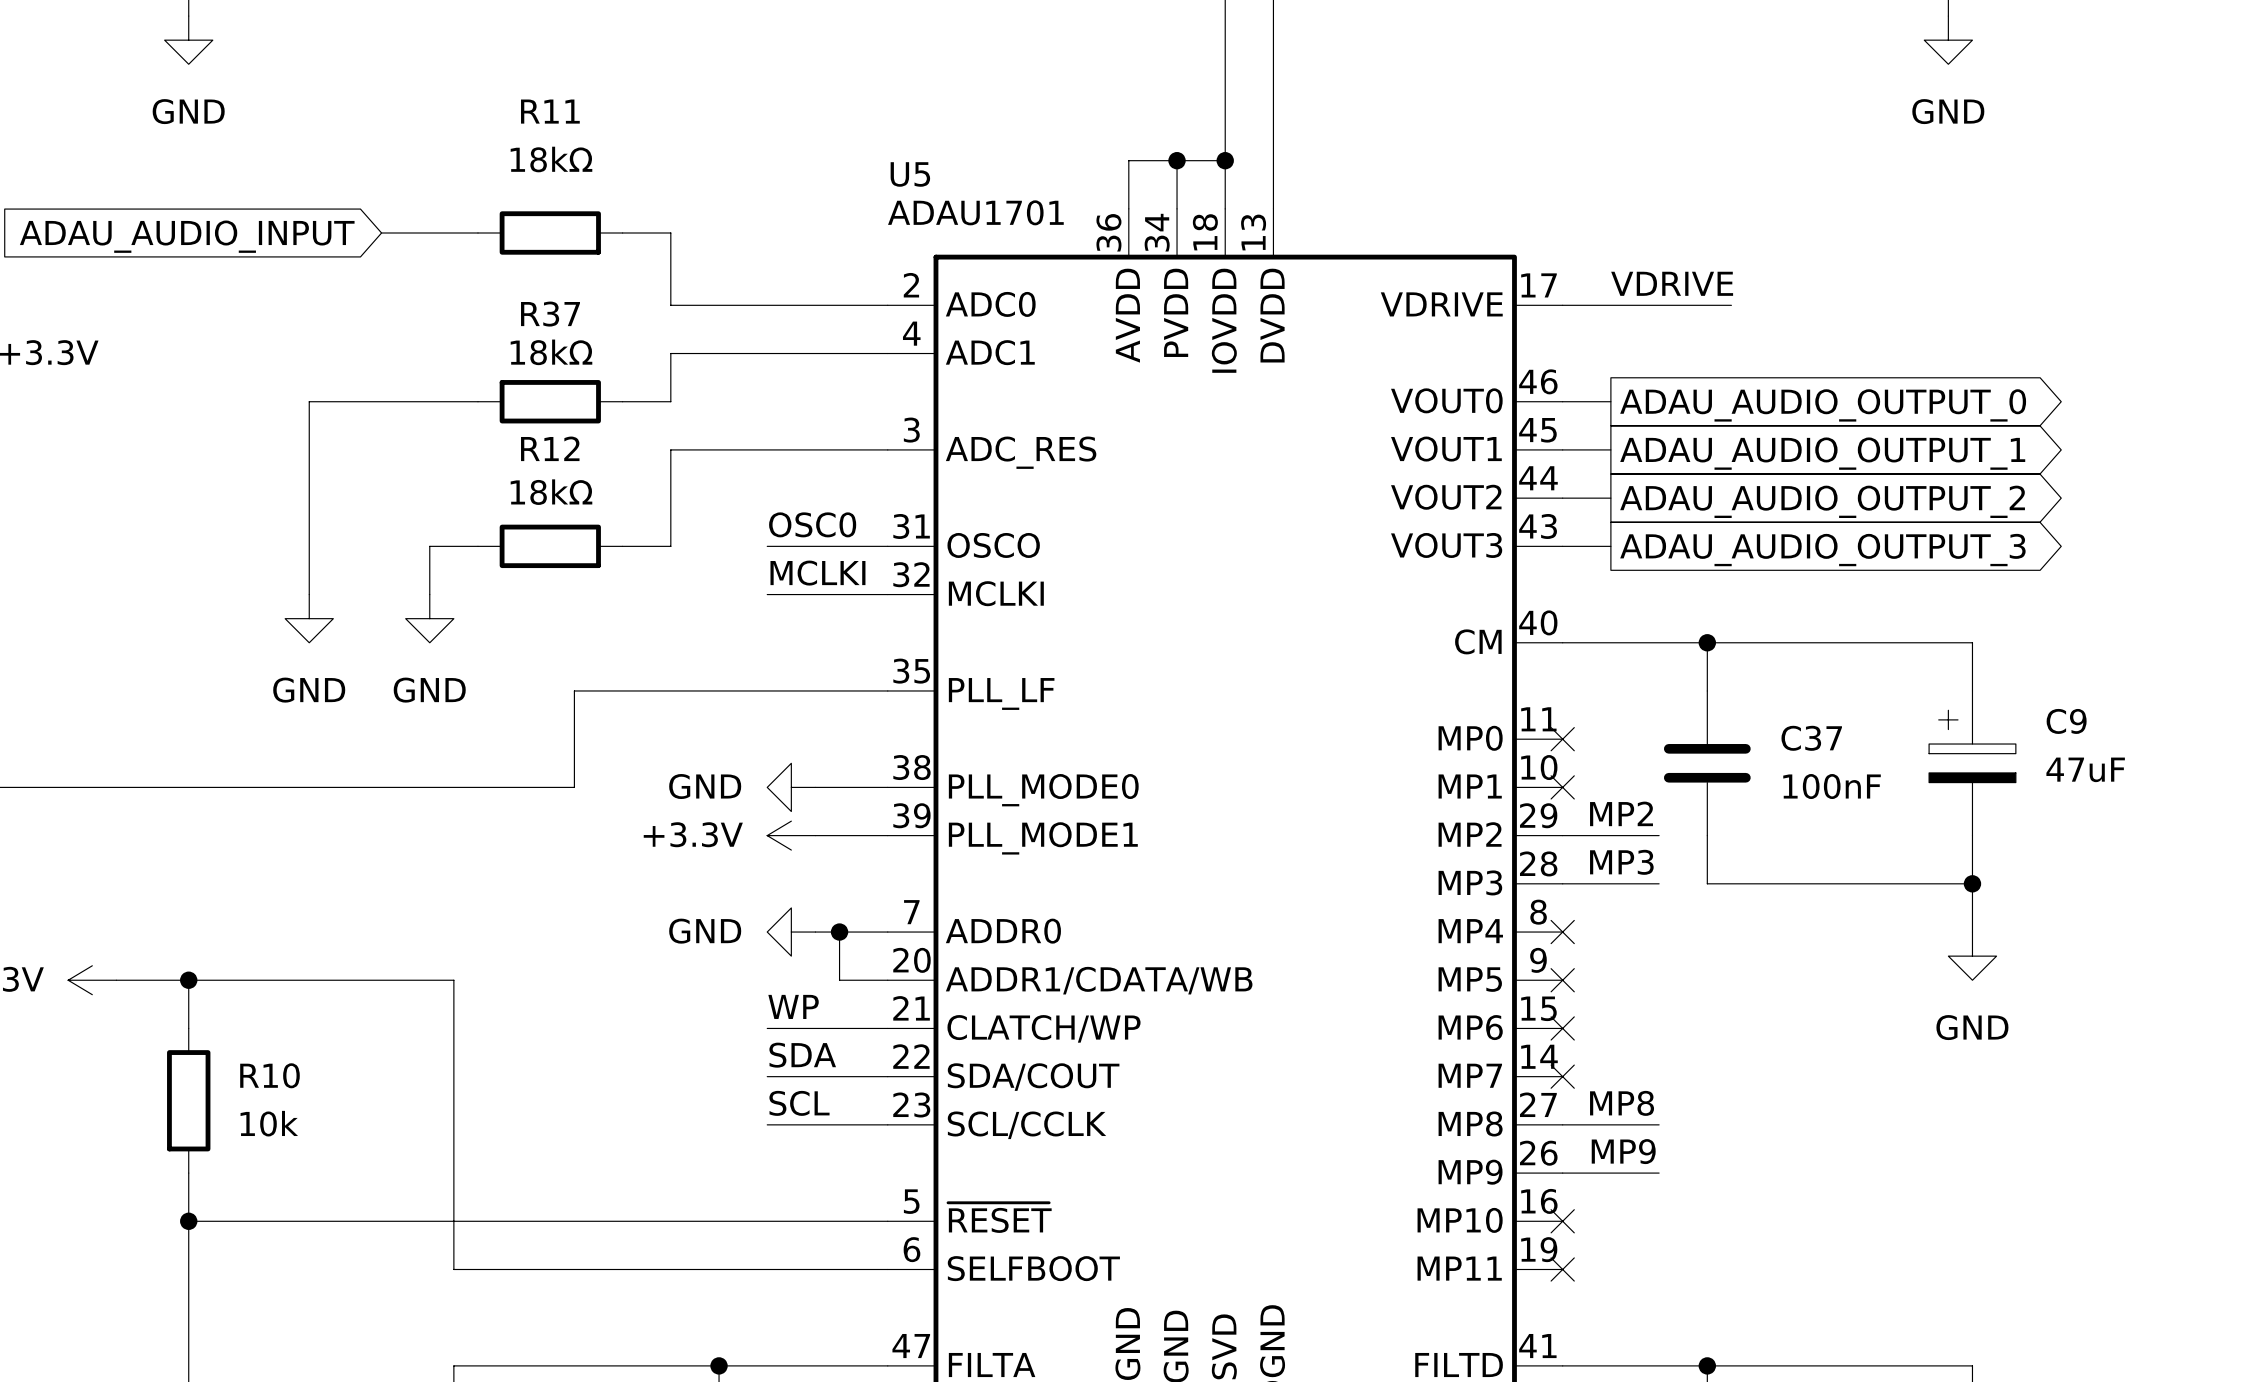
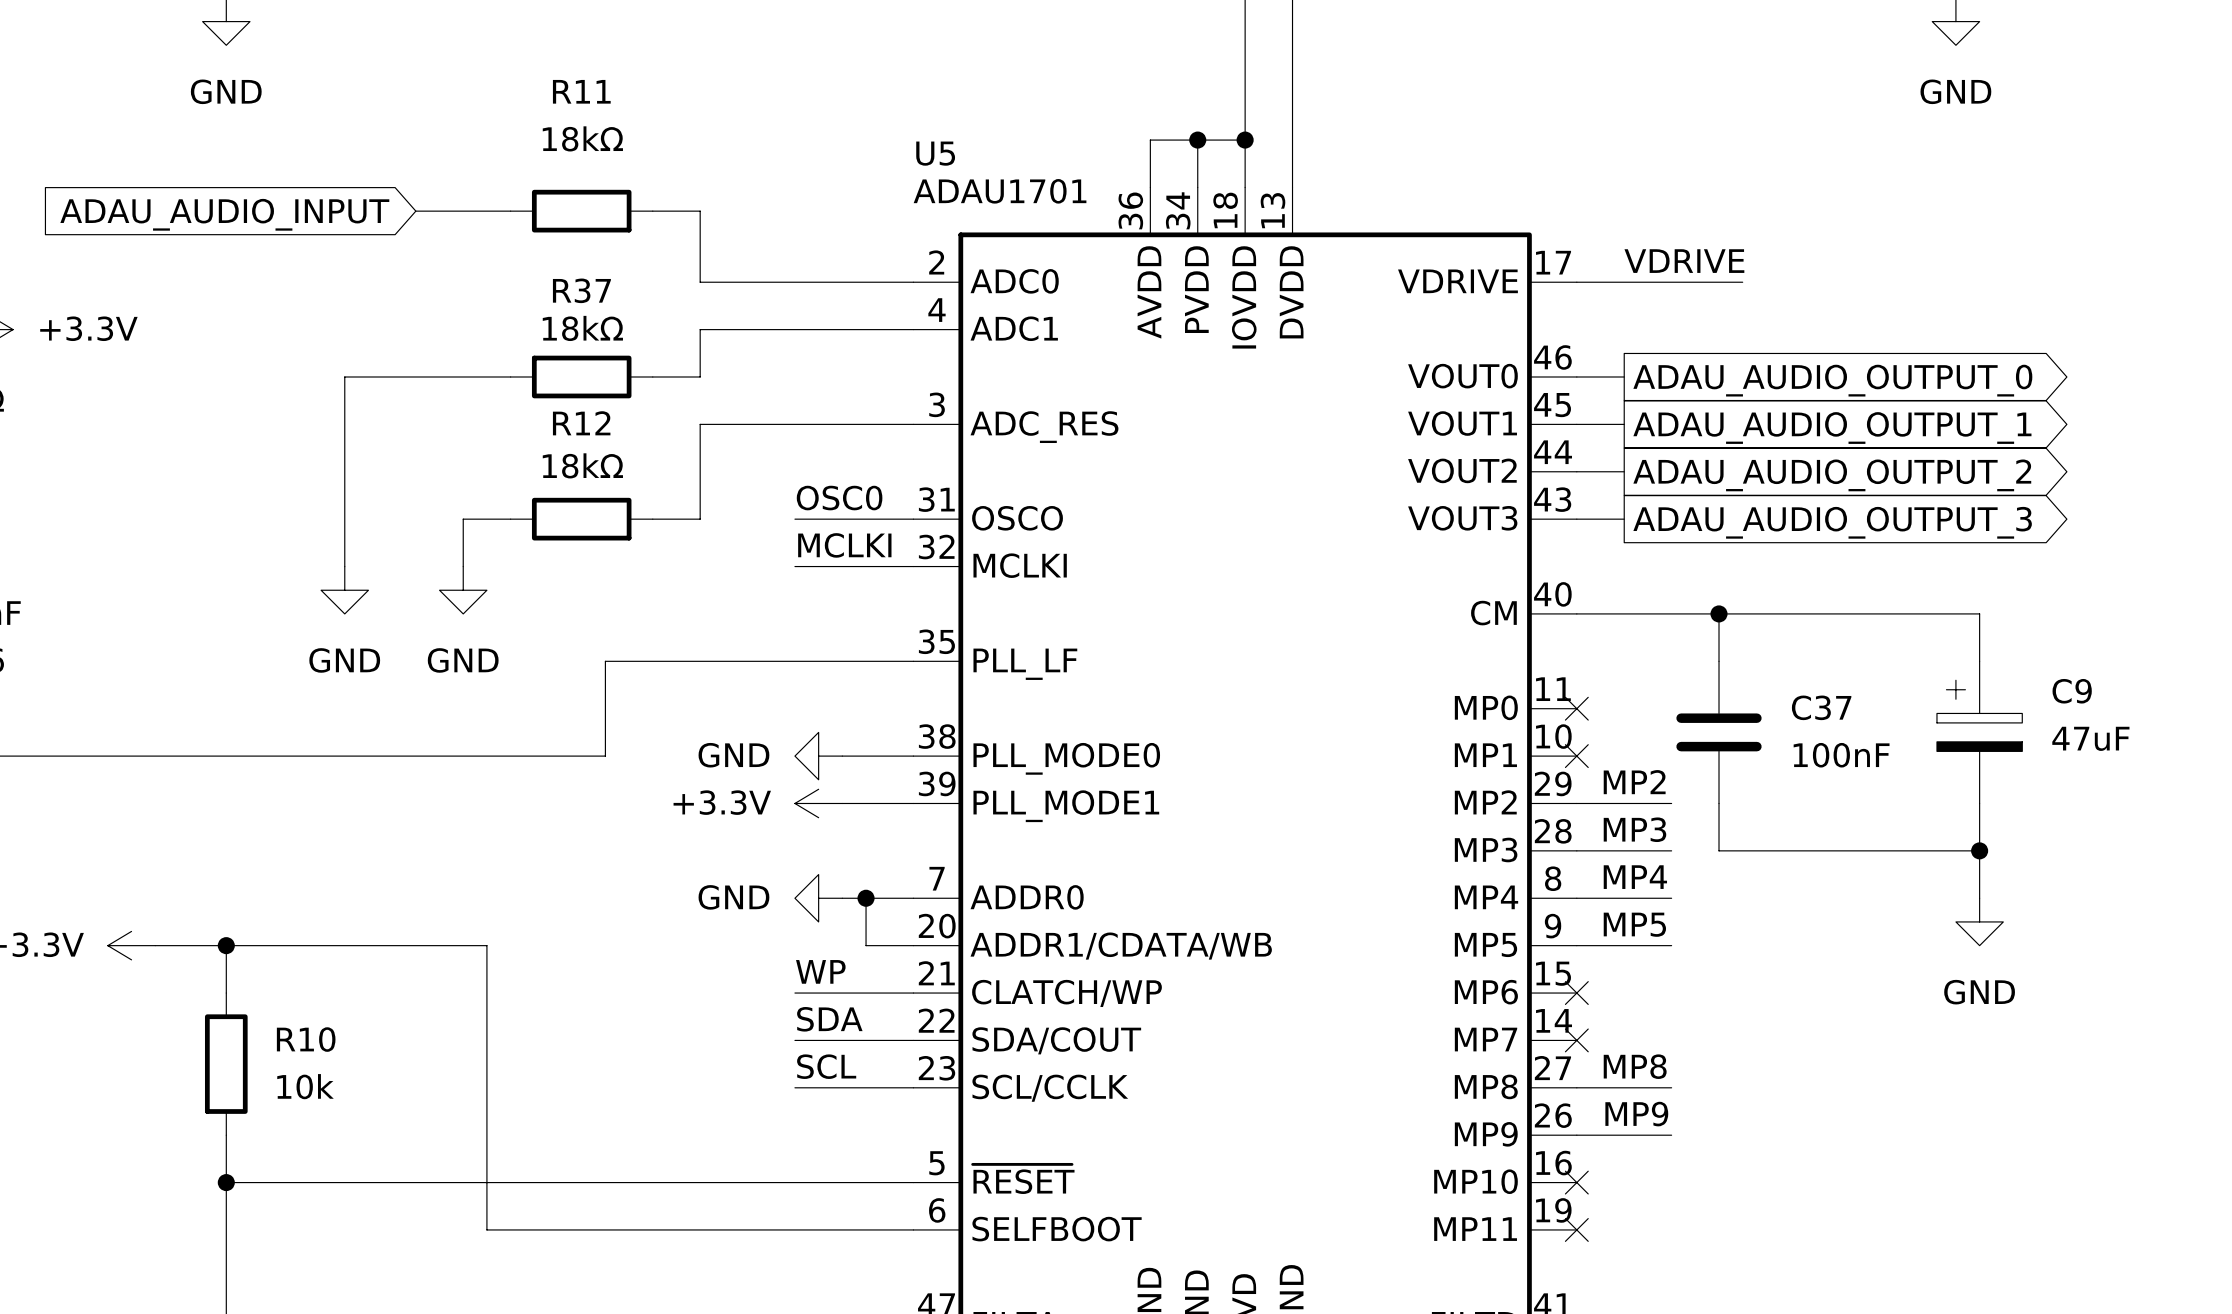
label: none -> MP4 (1635, 877)
wire: none -> (1576, 898) (1671, 898)
no-connect mark: (1562, 932) -> none
label: none -> MP5 (1634, 924)
wire: none -> (1576, 945) (1671, 945)
no-connect mark: (1562, 980) -> none

